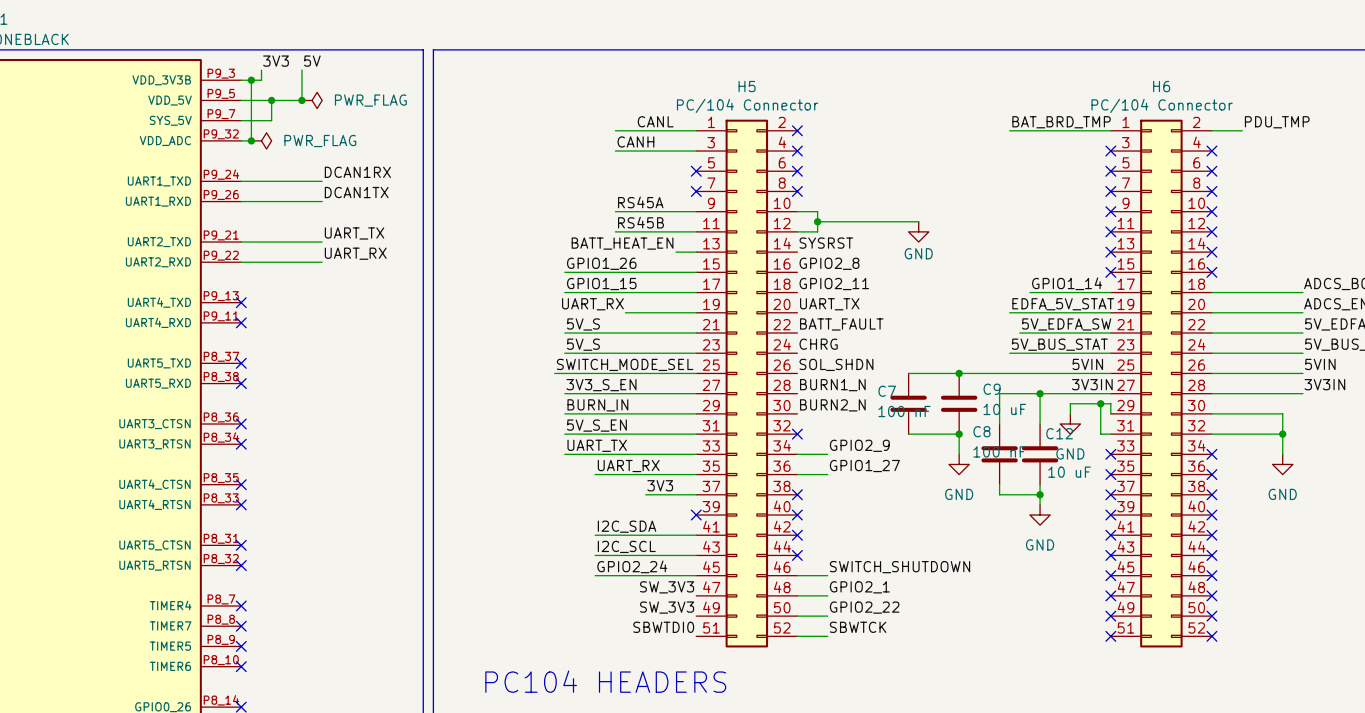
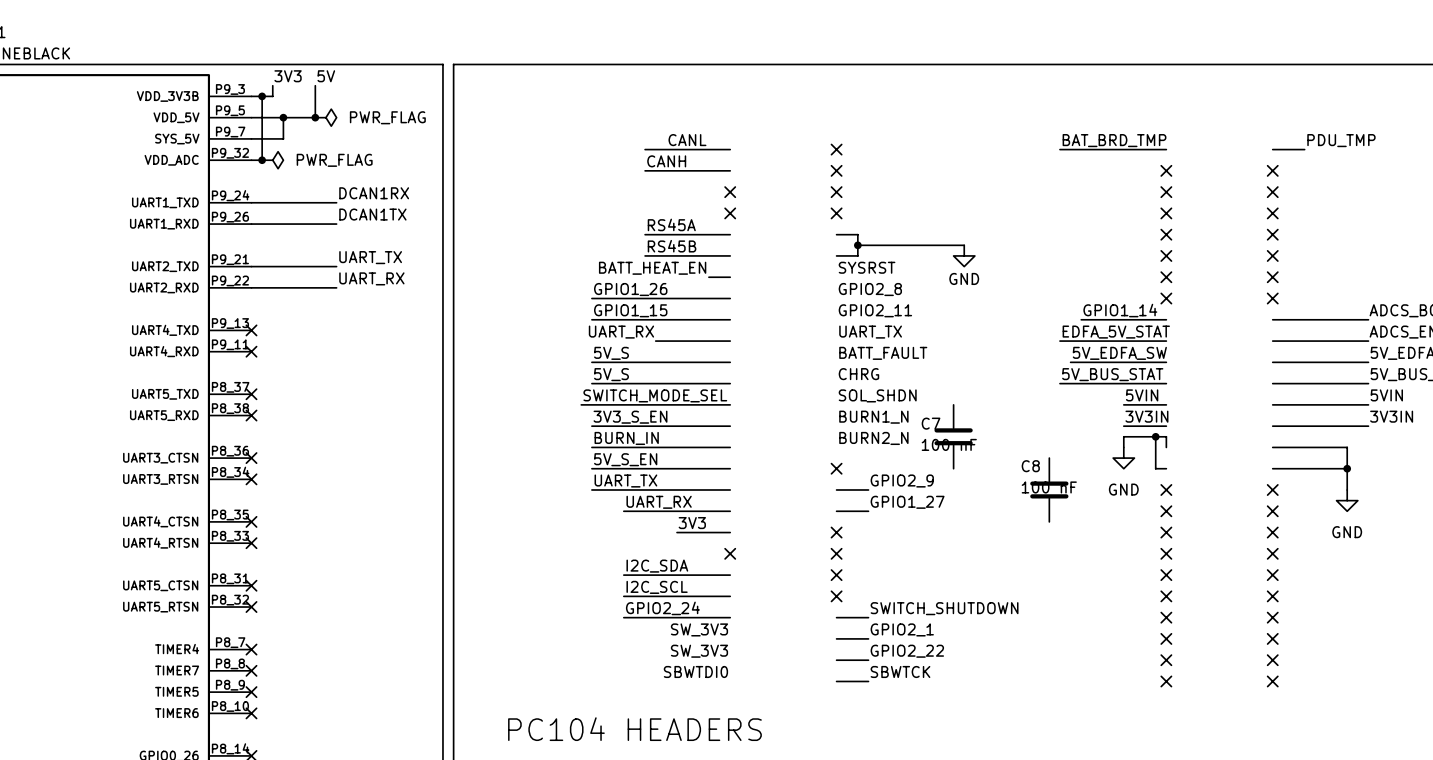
wire: (908, 373) (1070, 373) -> none
junction: (959, 373) -> none
H5: PC/104 Connector (746, 383) -> none
H6: PC/104 Connector (1161, 383) -> none
wire: (1040, 393) (1040, 424) -> none
junction: (1040, 393) -> none
wire: (1070, 393) (999, 393) (999, 424) -> none
C9: 10 uF (959, 403) -> none
wire: (908, 434) (959, 434) (959, 454) -> none
junction: (959, 434) -> none
C12: 10 uF (1040, 454) -> none
power symbol: GND (959, 464) -> none
wire: (999, 484) (999, 494) (1040, 494) -> none
wire: (1040, 484) (1040, 504) -> none
junction: (1040, 494) -> none
power symbol: GND (1040, 515) -> none

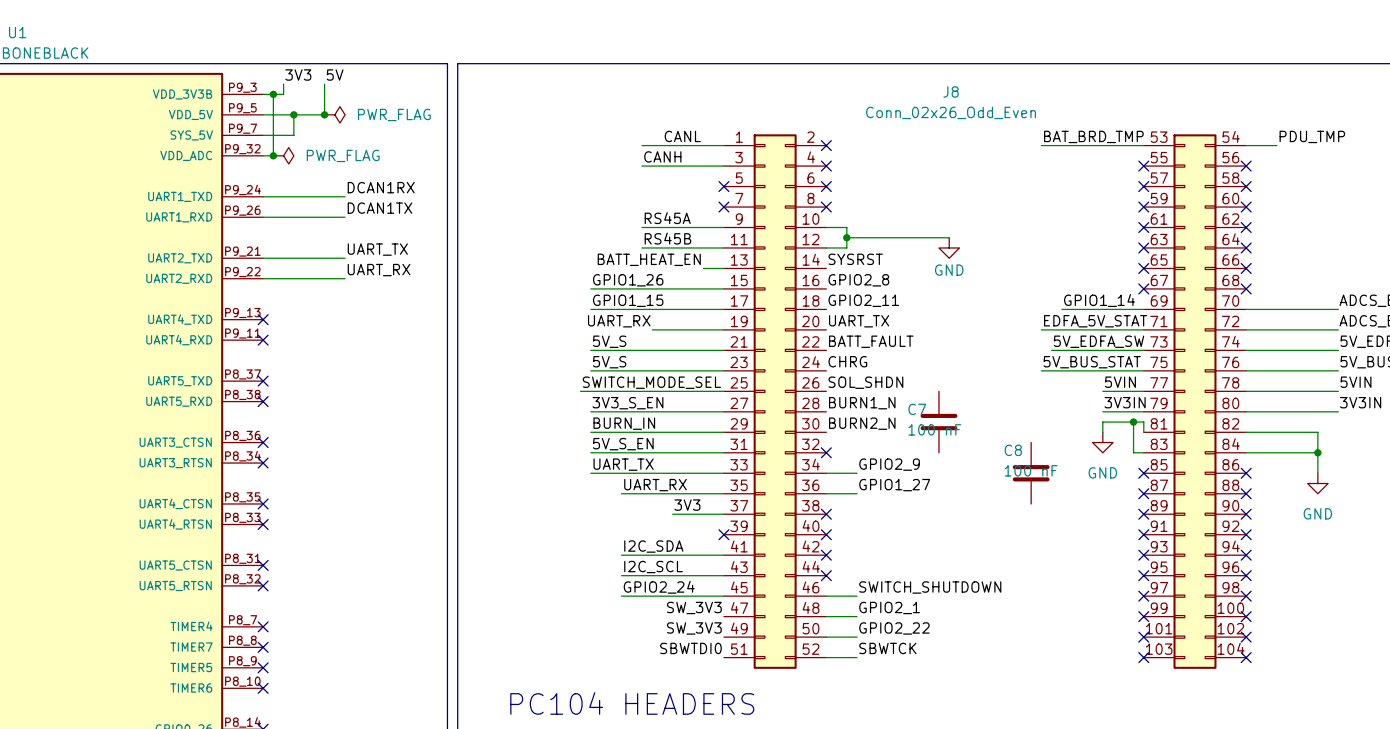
J8: none -> Conn_02x26_Odd_Even (985, 401)

